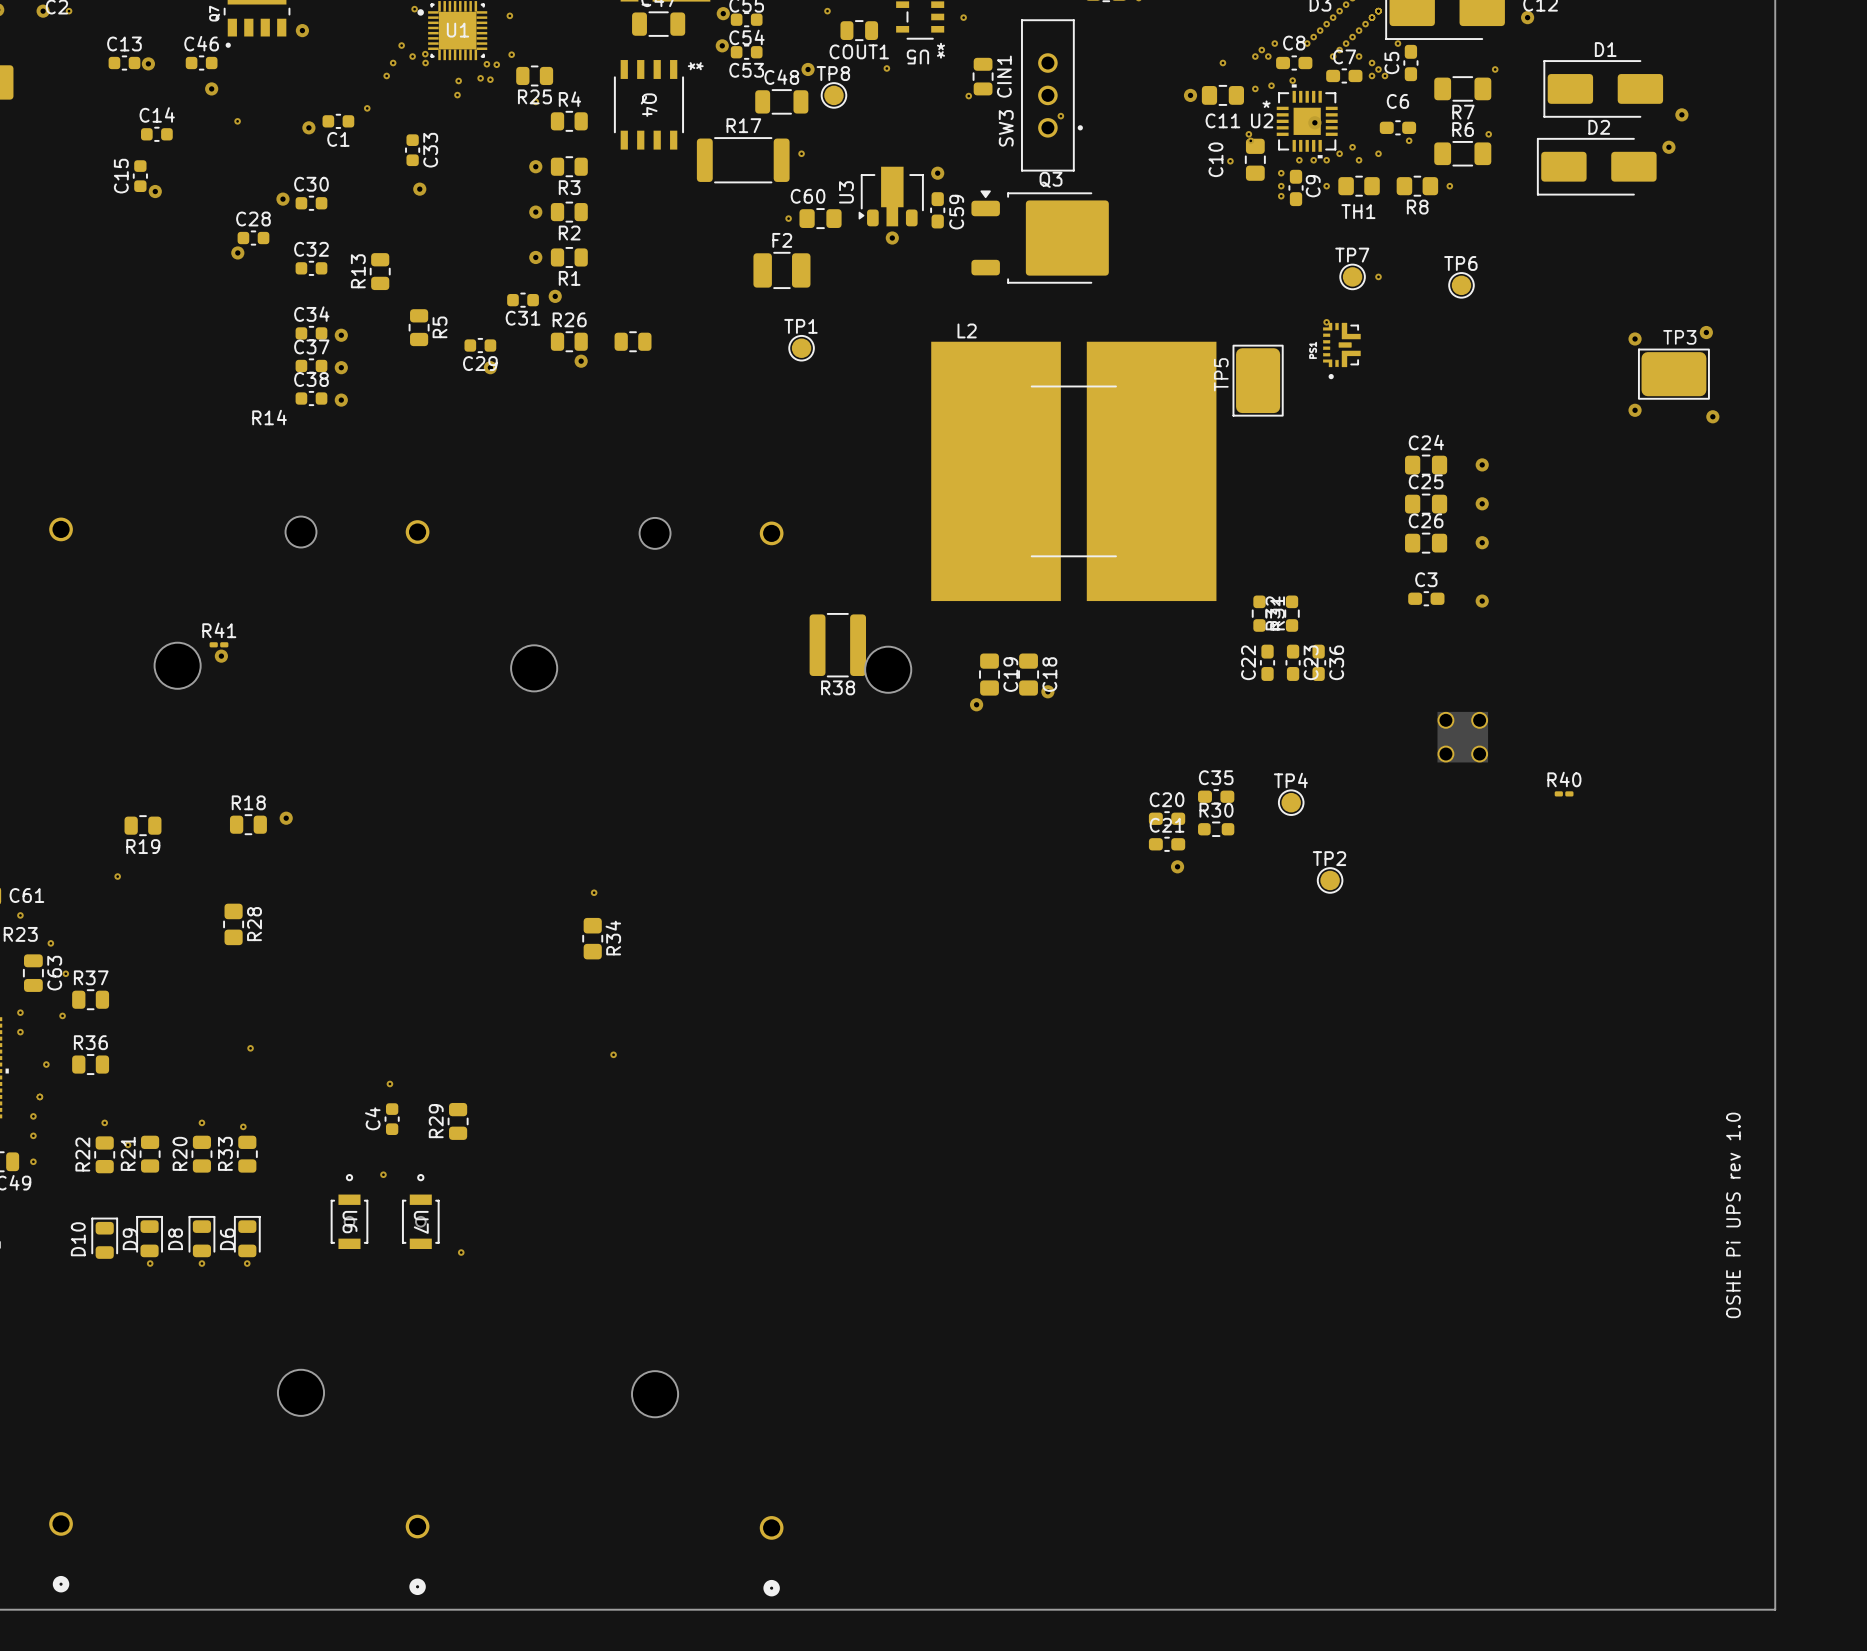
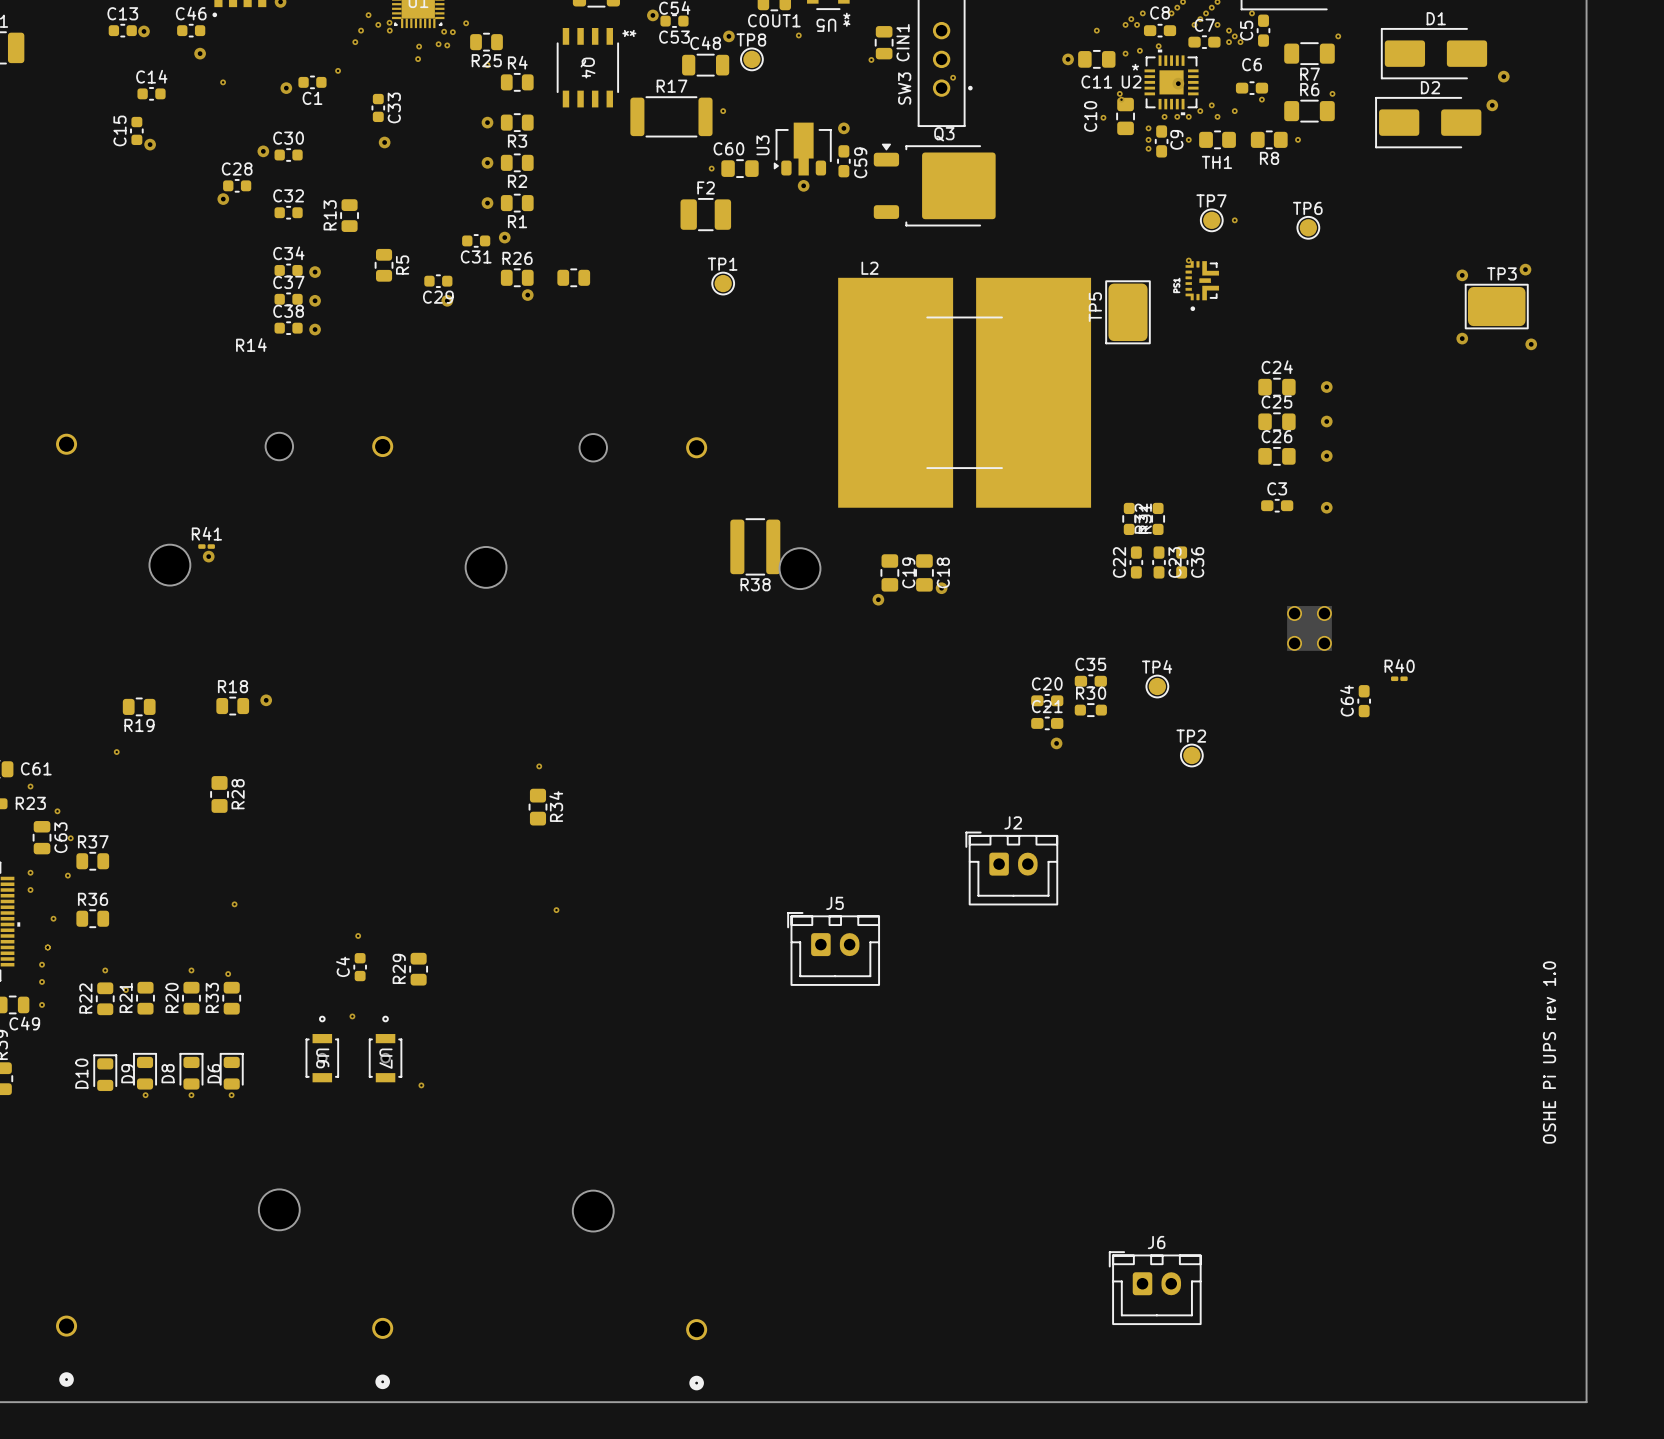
C64: none -> (1364, 701)
J2: none -> (1011, 868)
J5: none -> (833, 948)
J6: none -> (1155, 1288)

